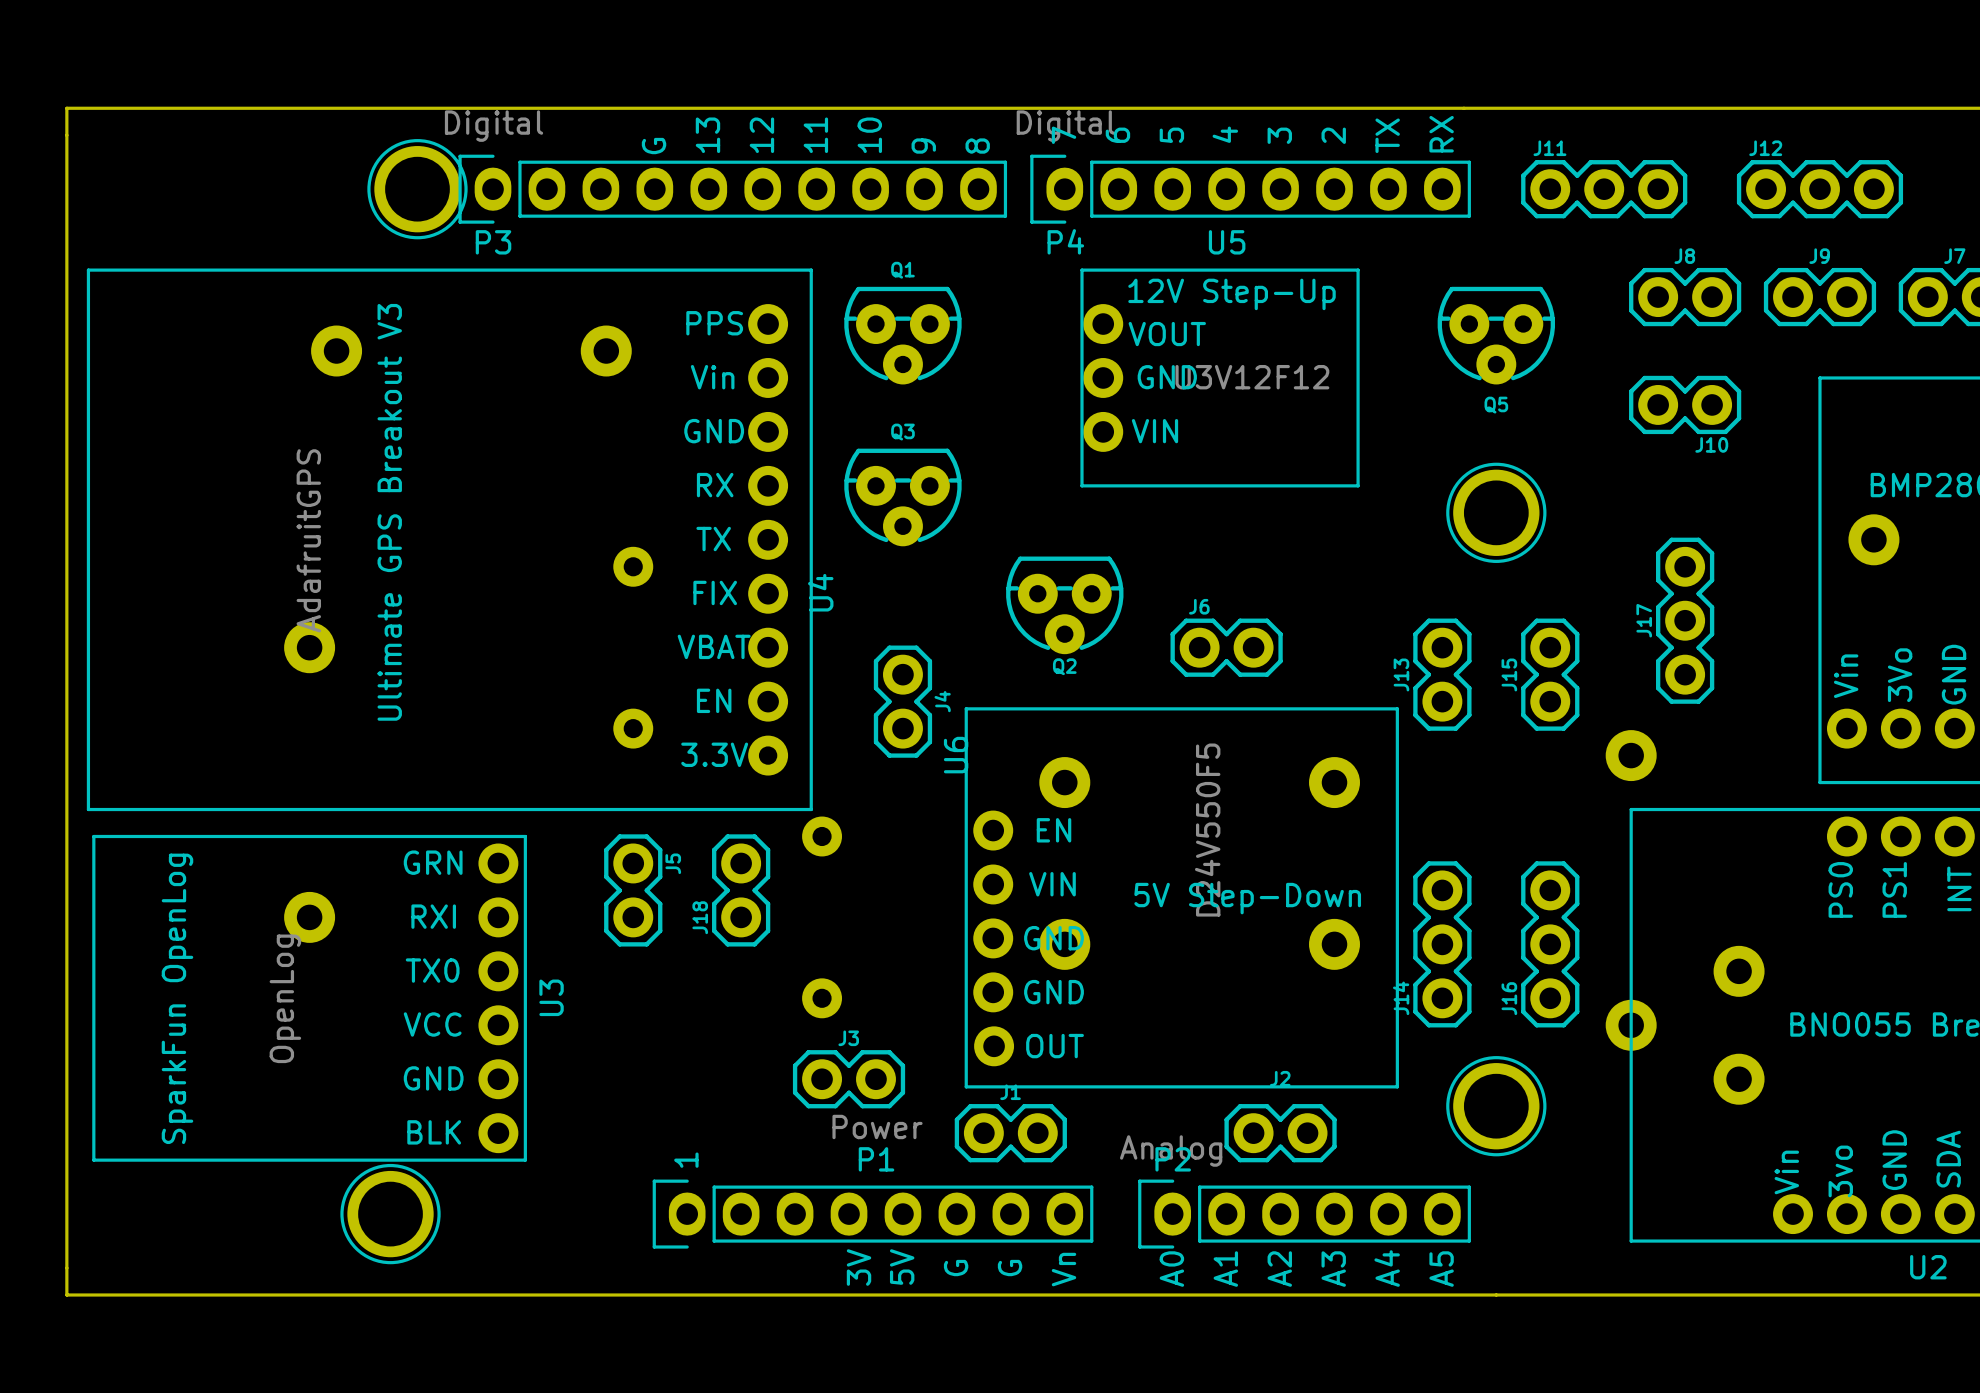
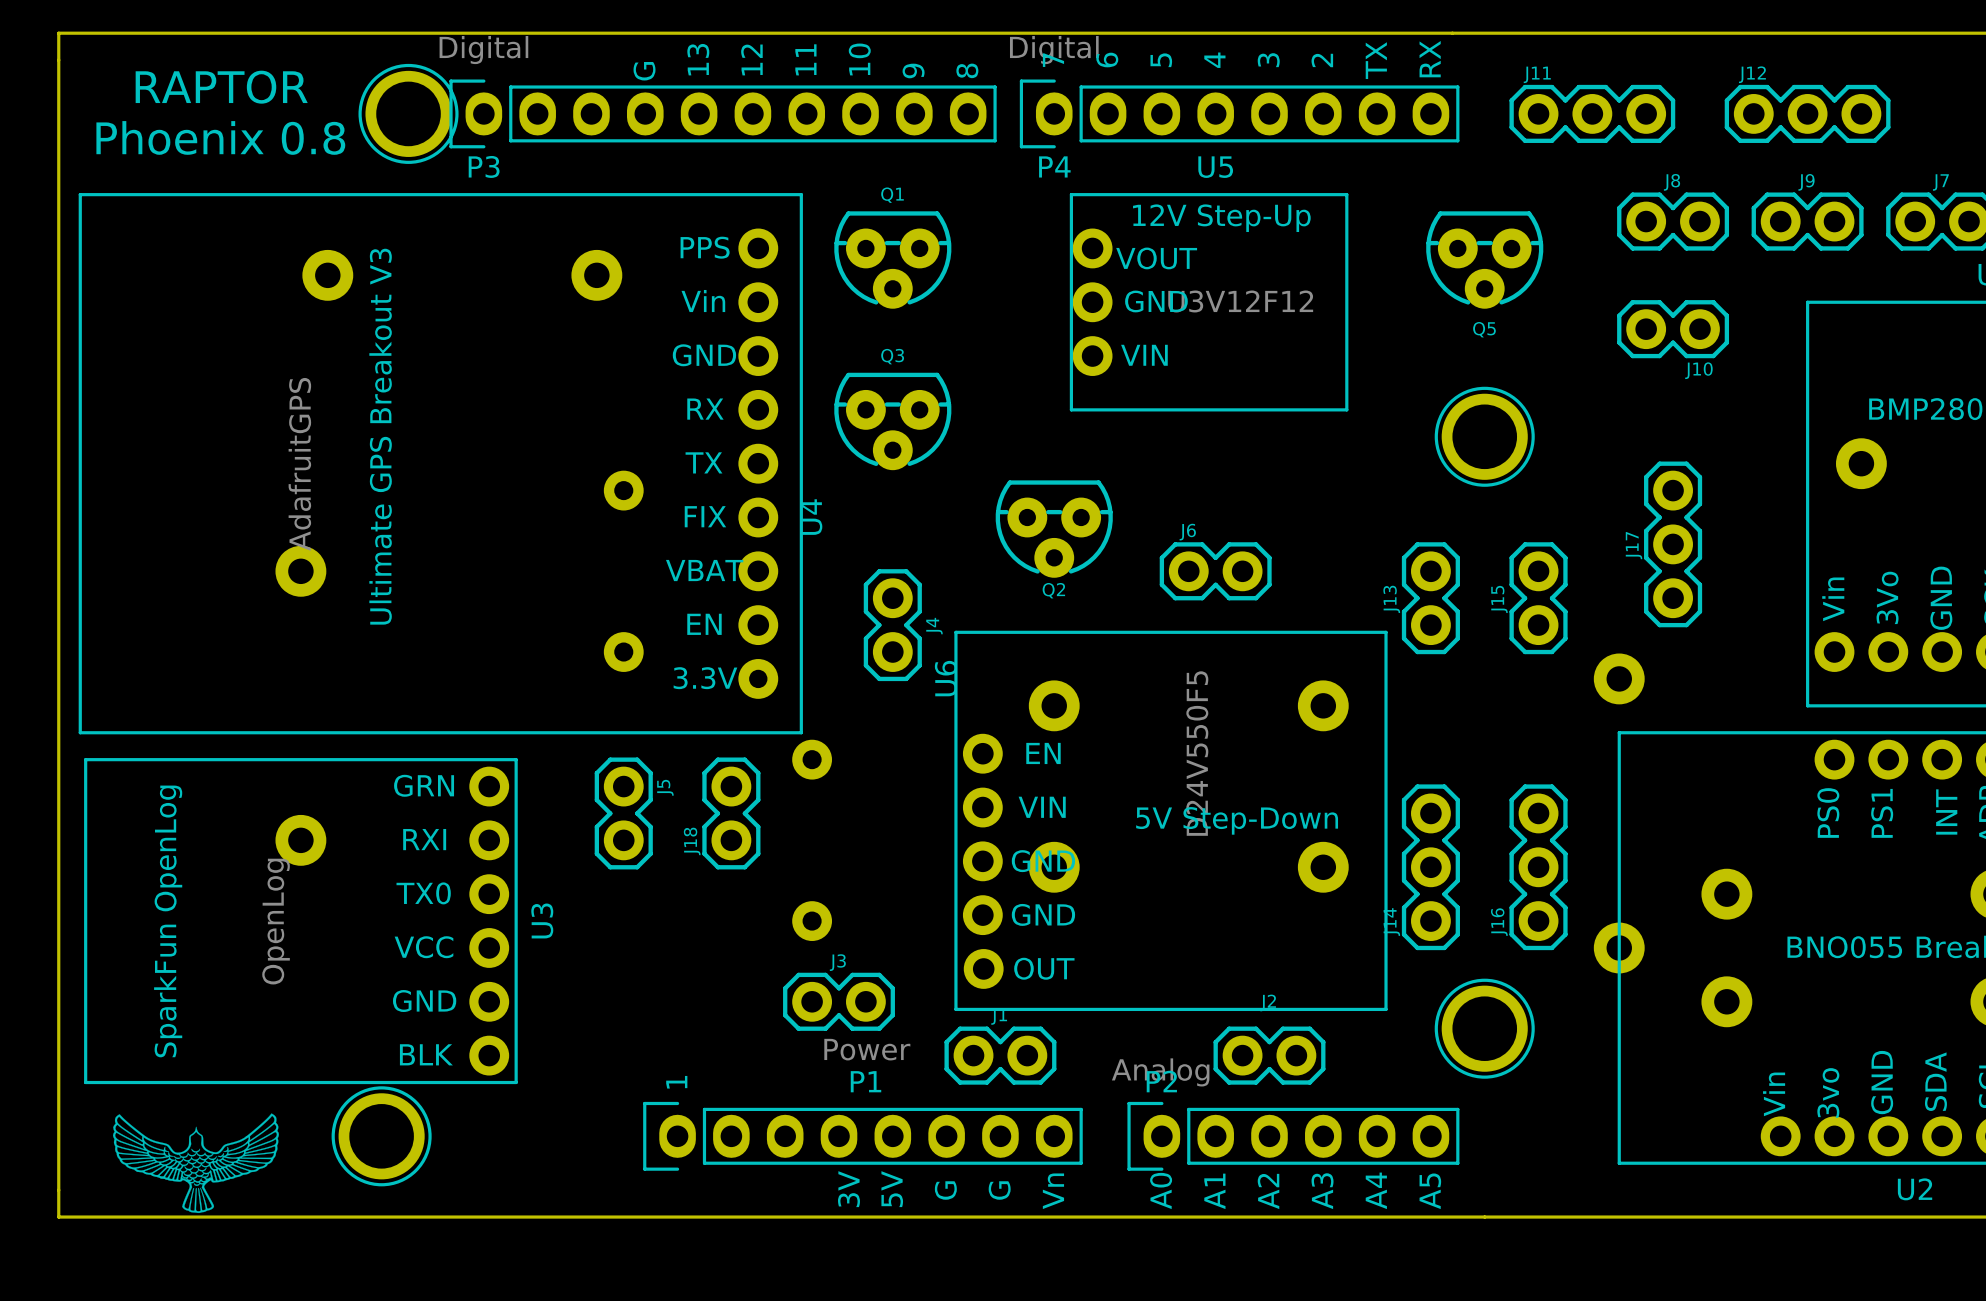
text: none -> RAPTOR (221, 87)
text: none -> Phoenix 0.8 (220, 137)
drawing: none -> [113, 1113, 279, 1214]

